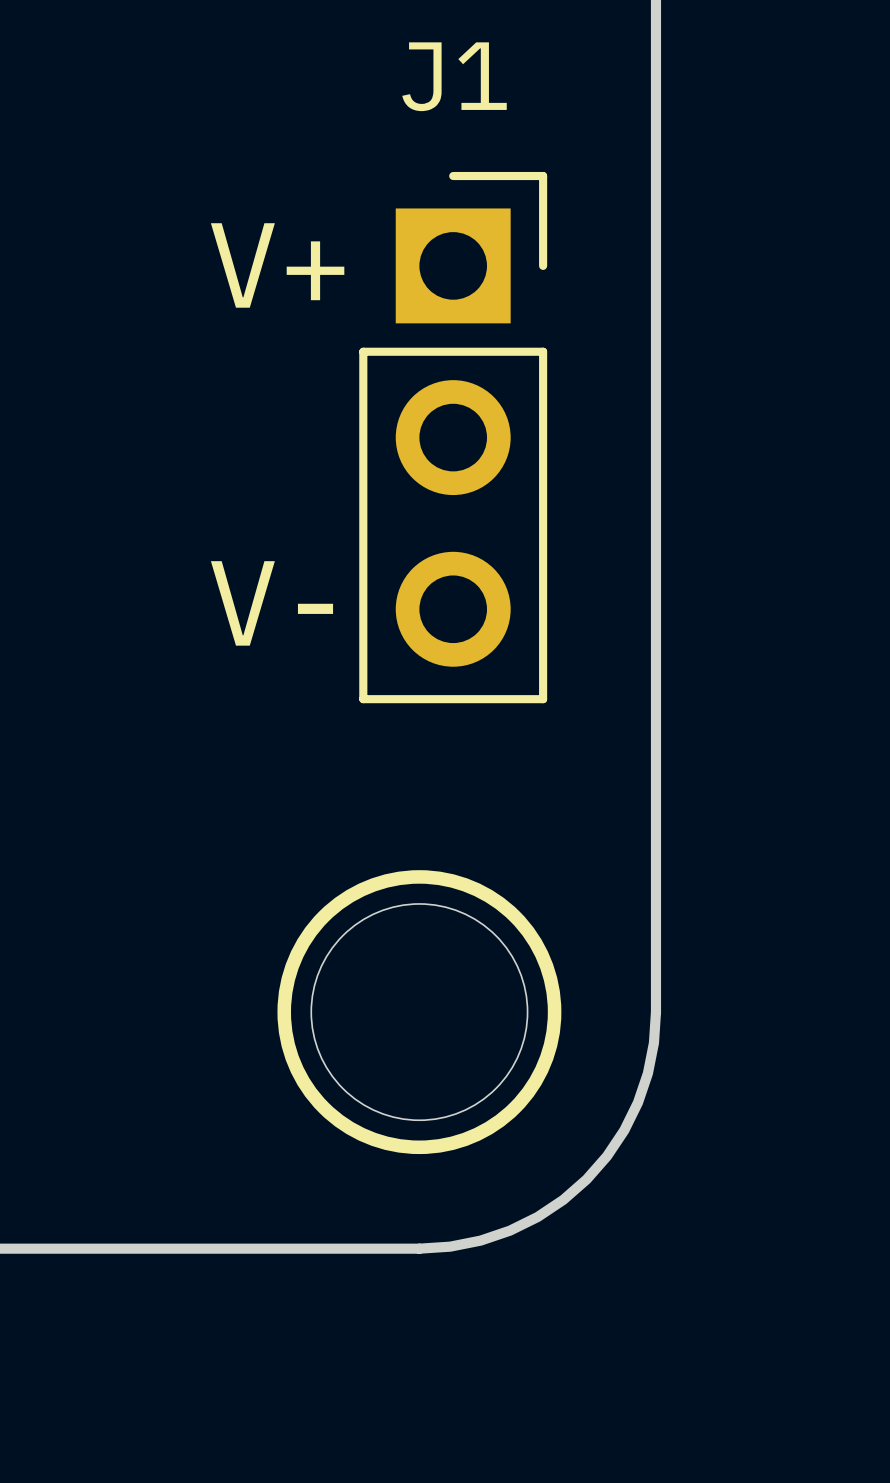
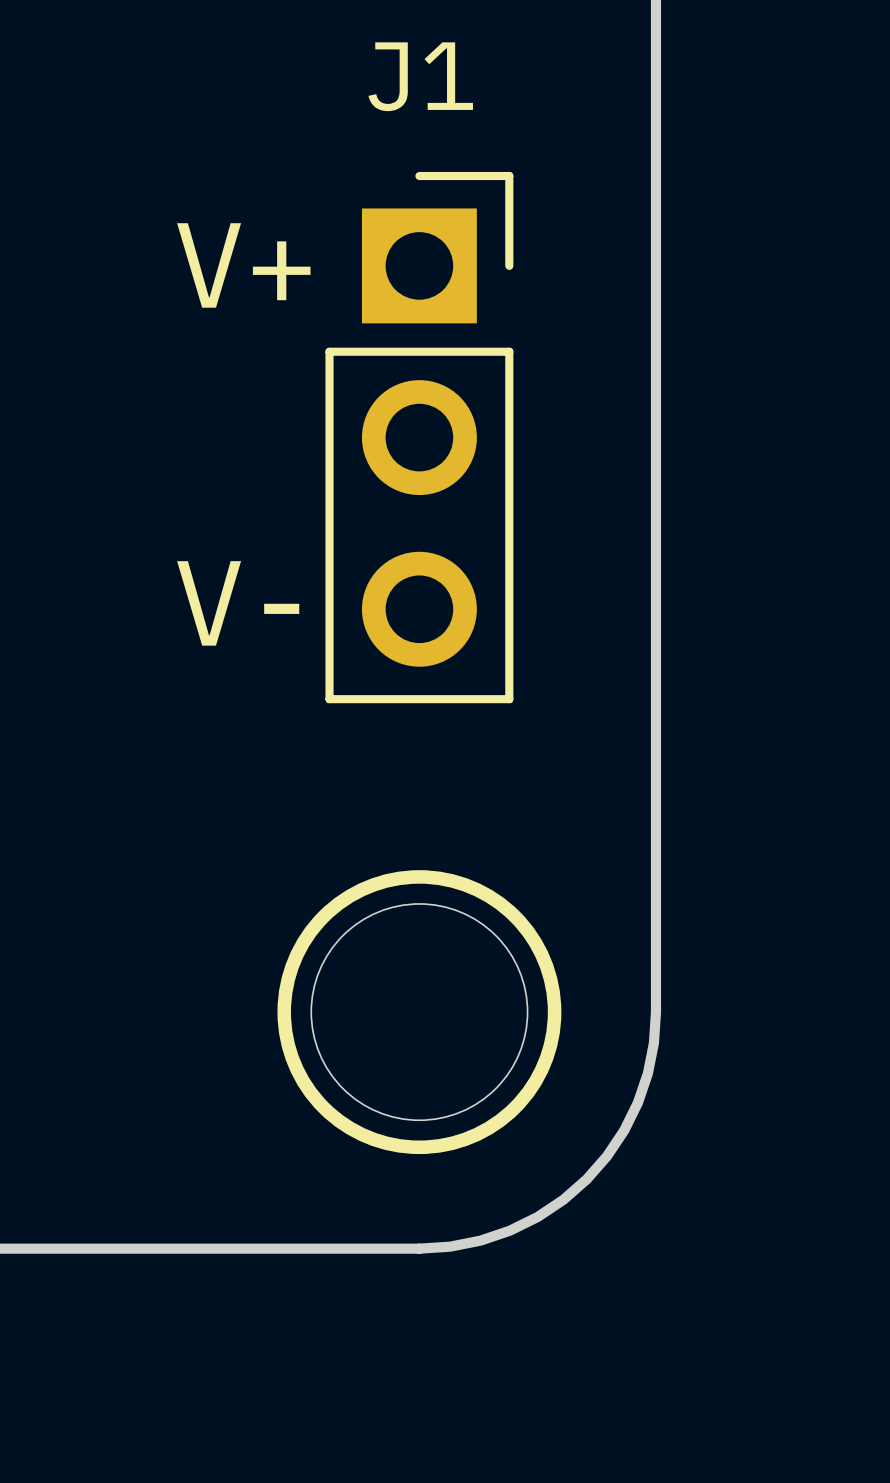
text position: V+ (277, 265) -> V+ (243, 265)
J1 position: (453, 437) -> (419, 437)
text position: V- (271, 603) -> V- (238, 603)

